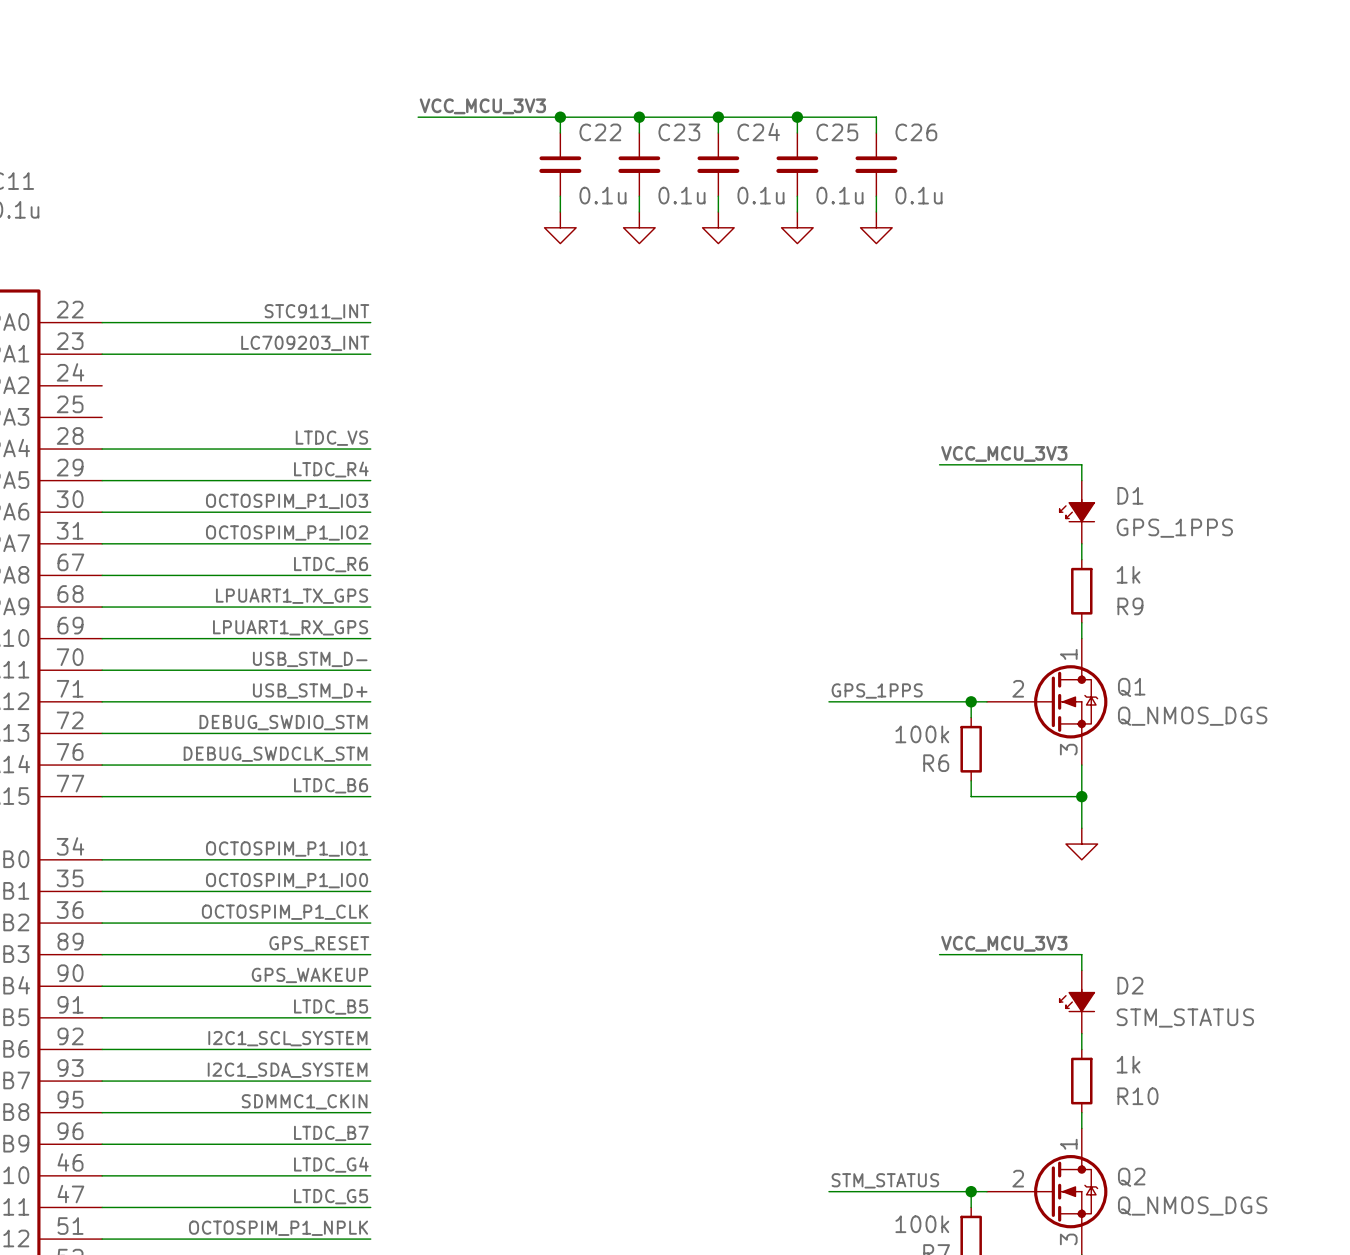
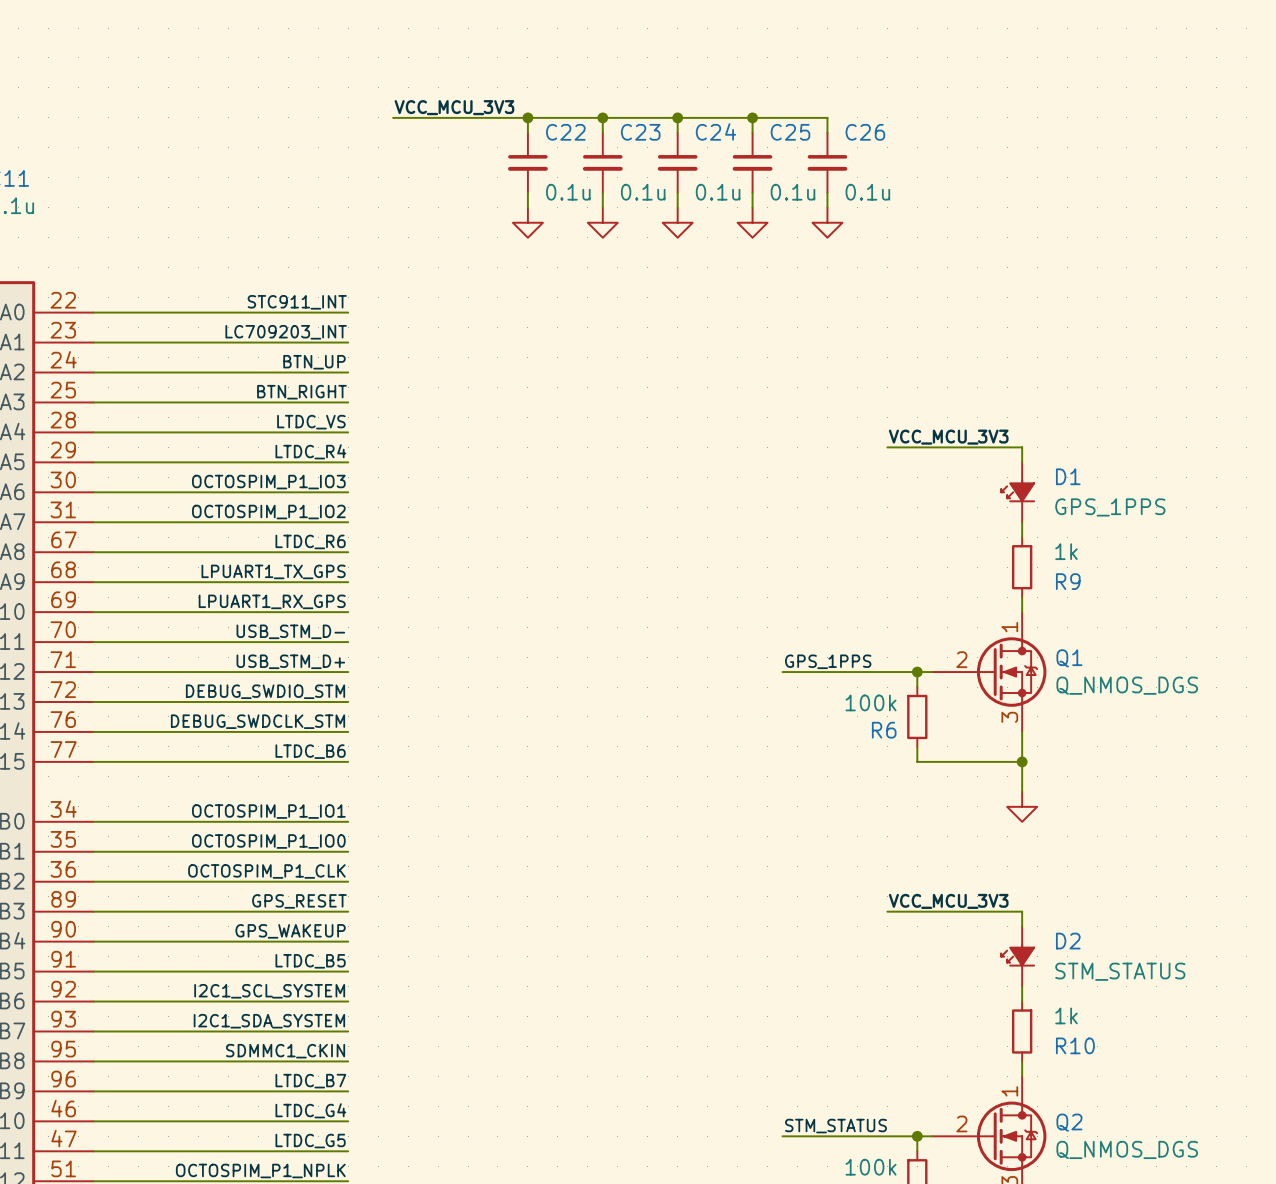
label: none -> BTN_UP (314, 362)
wire: none -> (93, 372) (348, 372)
label: none -> BTN_RIGHT (301, 392)
wire: none -> (93, 402) (348, 402)

